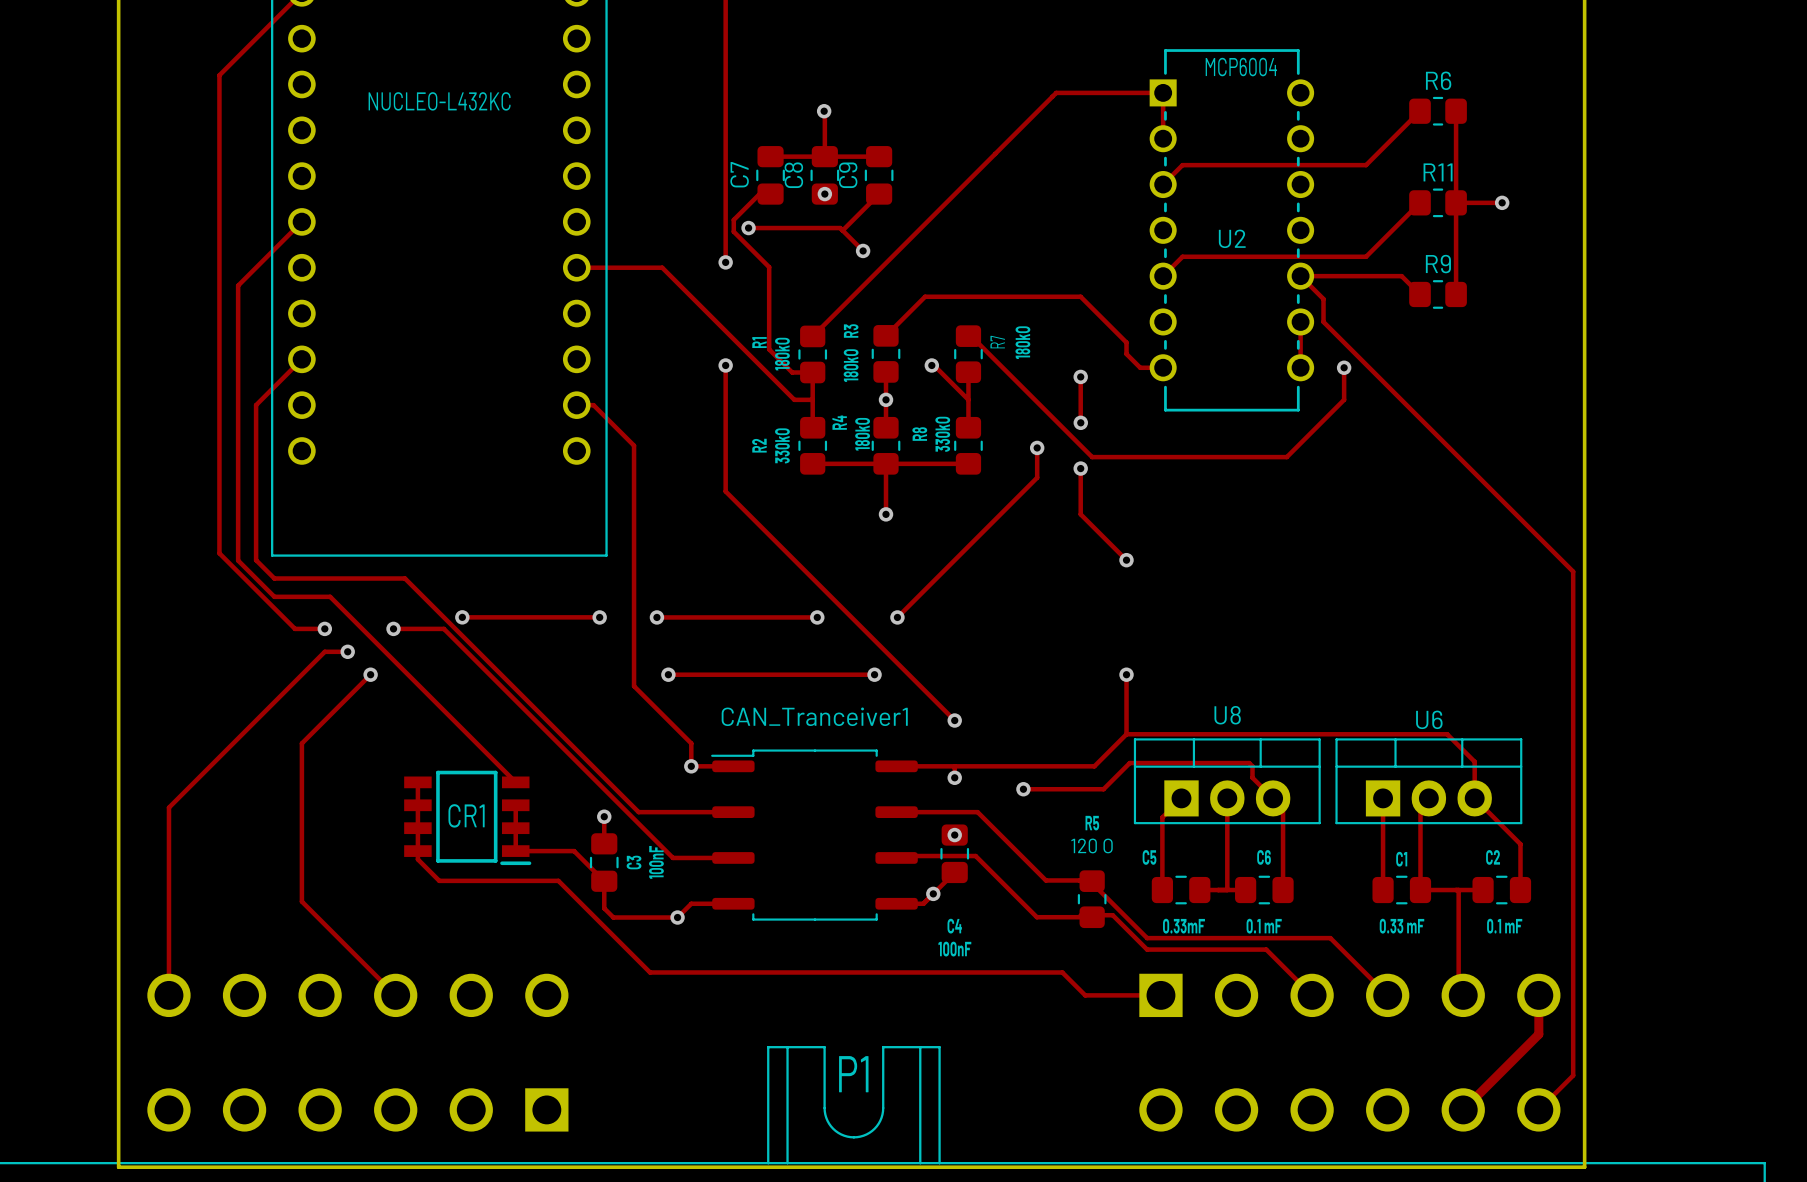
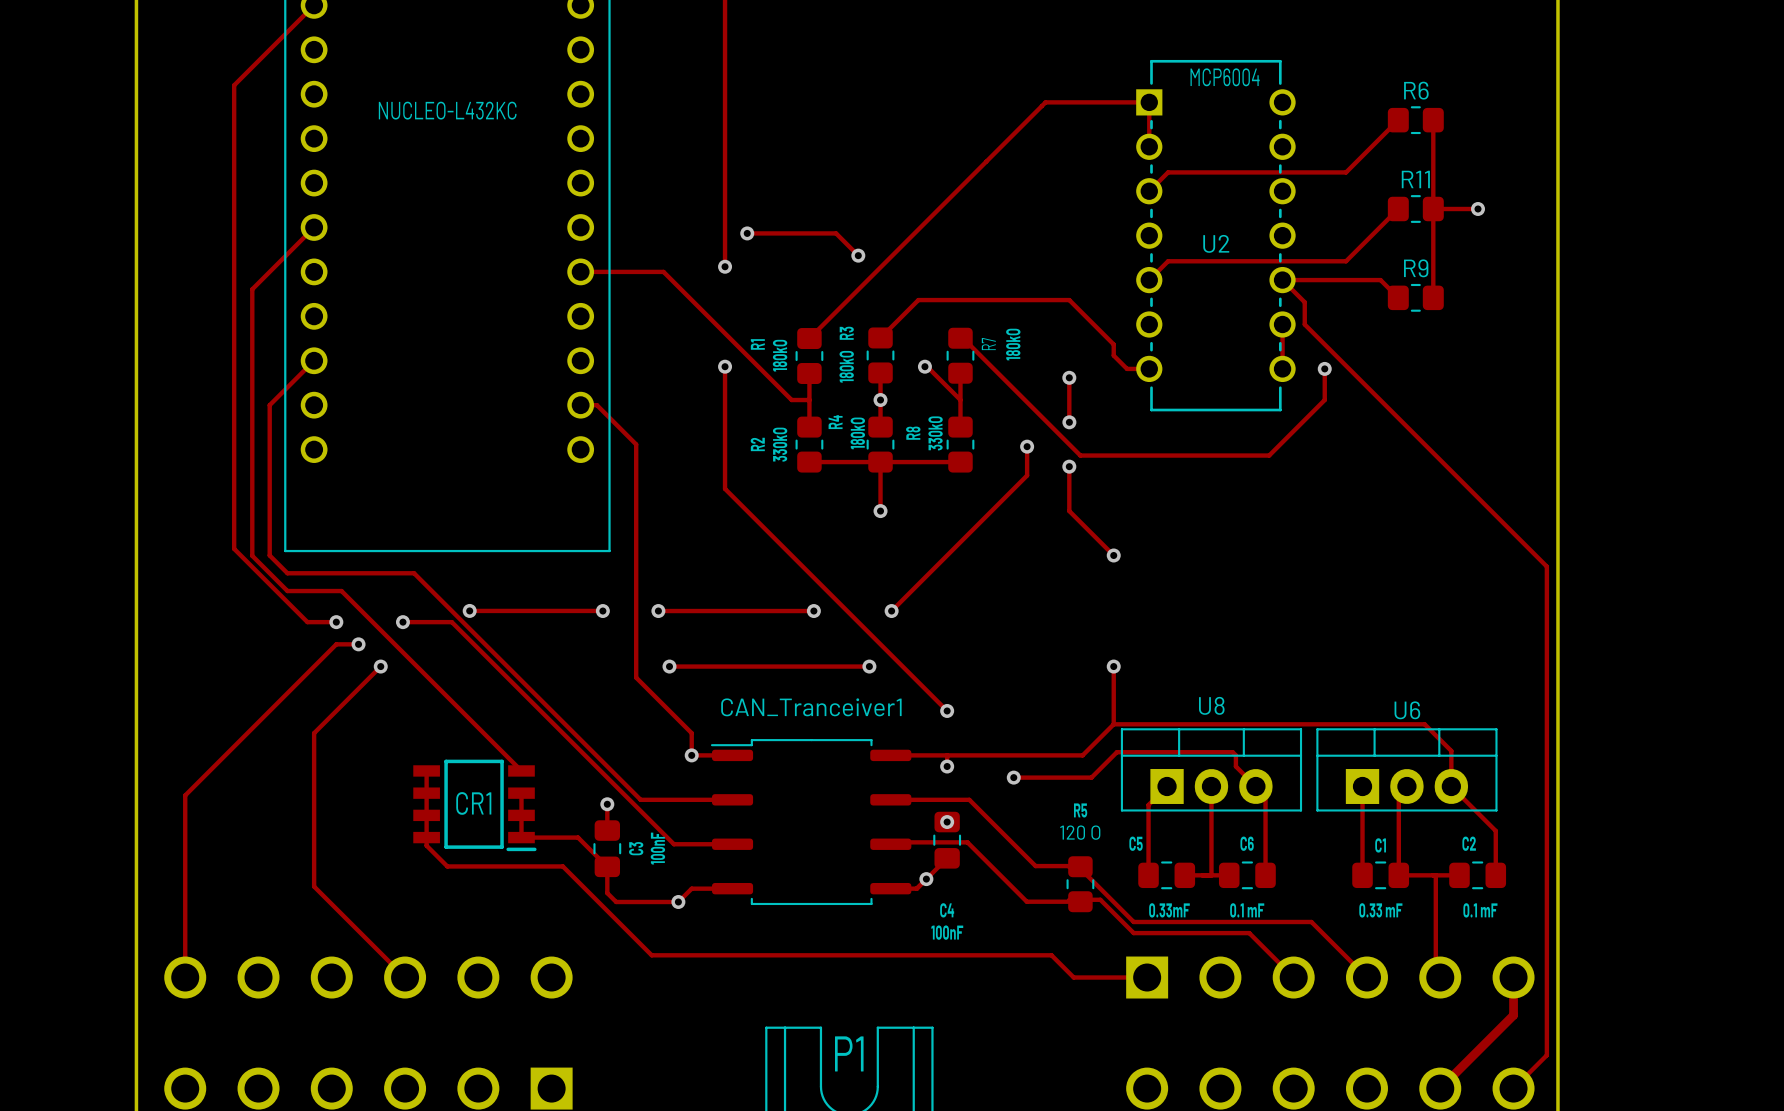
track: (824, 111) (824, 156) -> none
via: (824, 111) -> none
track: (770, 156) (879, 156) -> none
C7: (770, 175) -> none
C8: (824, 175) -> none
C9: (879, 175) -> none
track: (770, 194) (759, 194) (733, 219) (733, 231) (769, 267) (769, 349) (792, 372) (812, 372) -> none
via: (824, 194) -> none
track: (879, 194) (842, 230) -> none

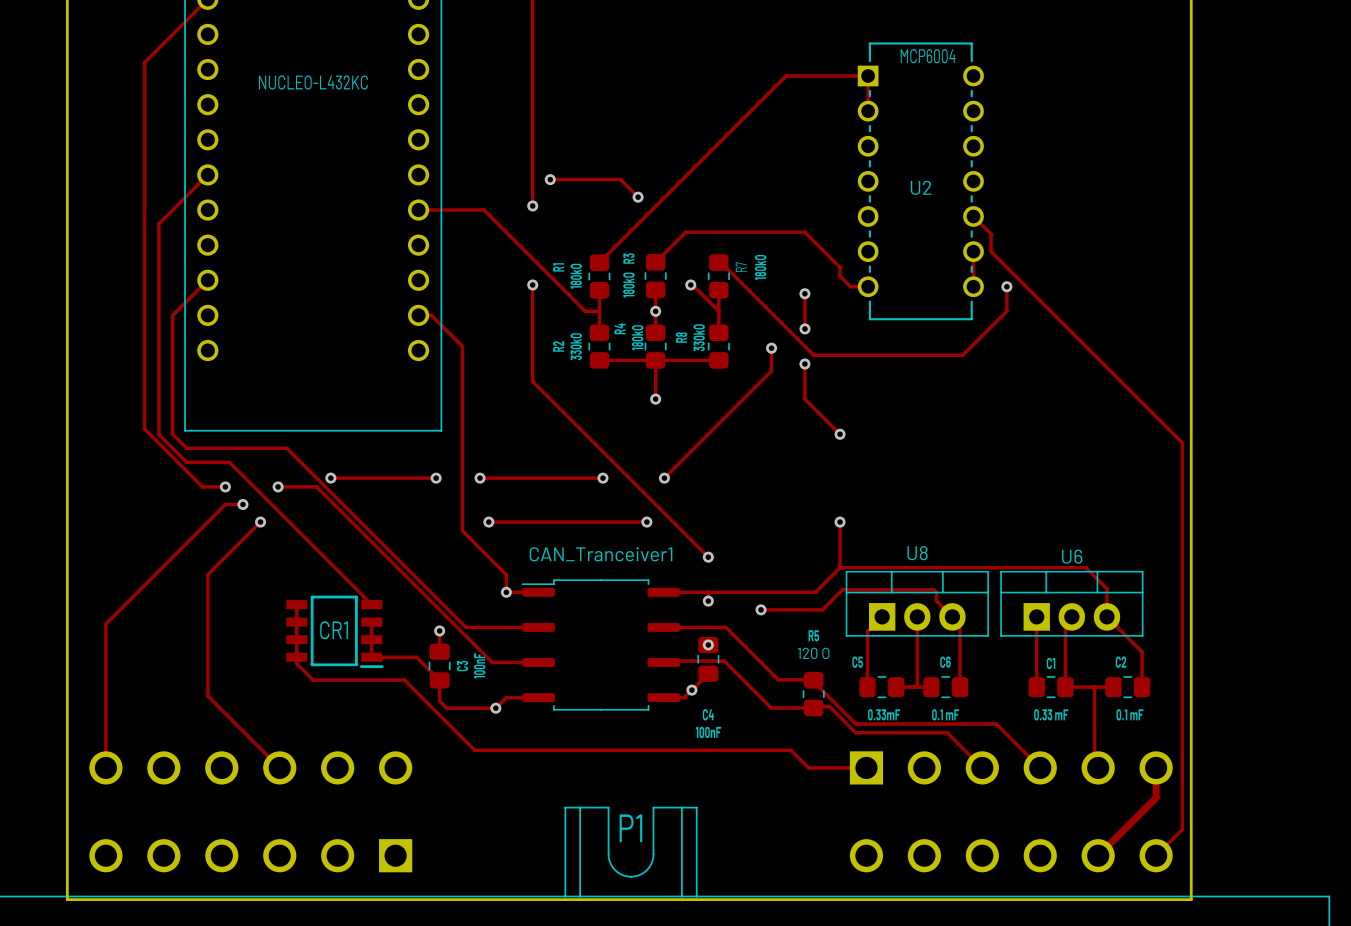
track: (1398, 120) (1346, 172) (1168, 172) (1149, 191) -> none
R6: (1415, 120) -> none
track: (1433, 120) (1433, 297) -> none
track: (1398, 209) (1346, 261) (1168, 261) (1149, 280) -> none
R11: (1415, 209) -> none
track: (1433, 209) (1478, 209) -> none
via: (1478, 209) -> none
track: (1282, 280) (1380, 280) (1398, 297) -> none
R9: (1415, 297) -> none

